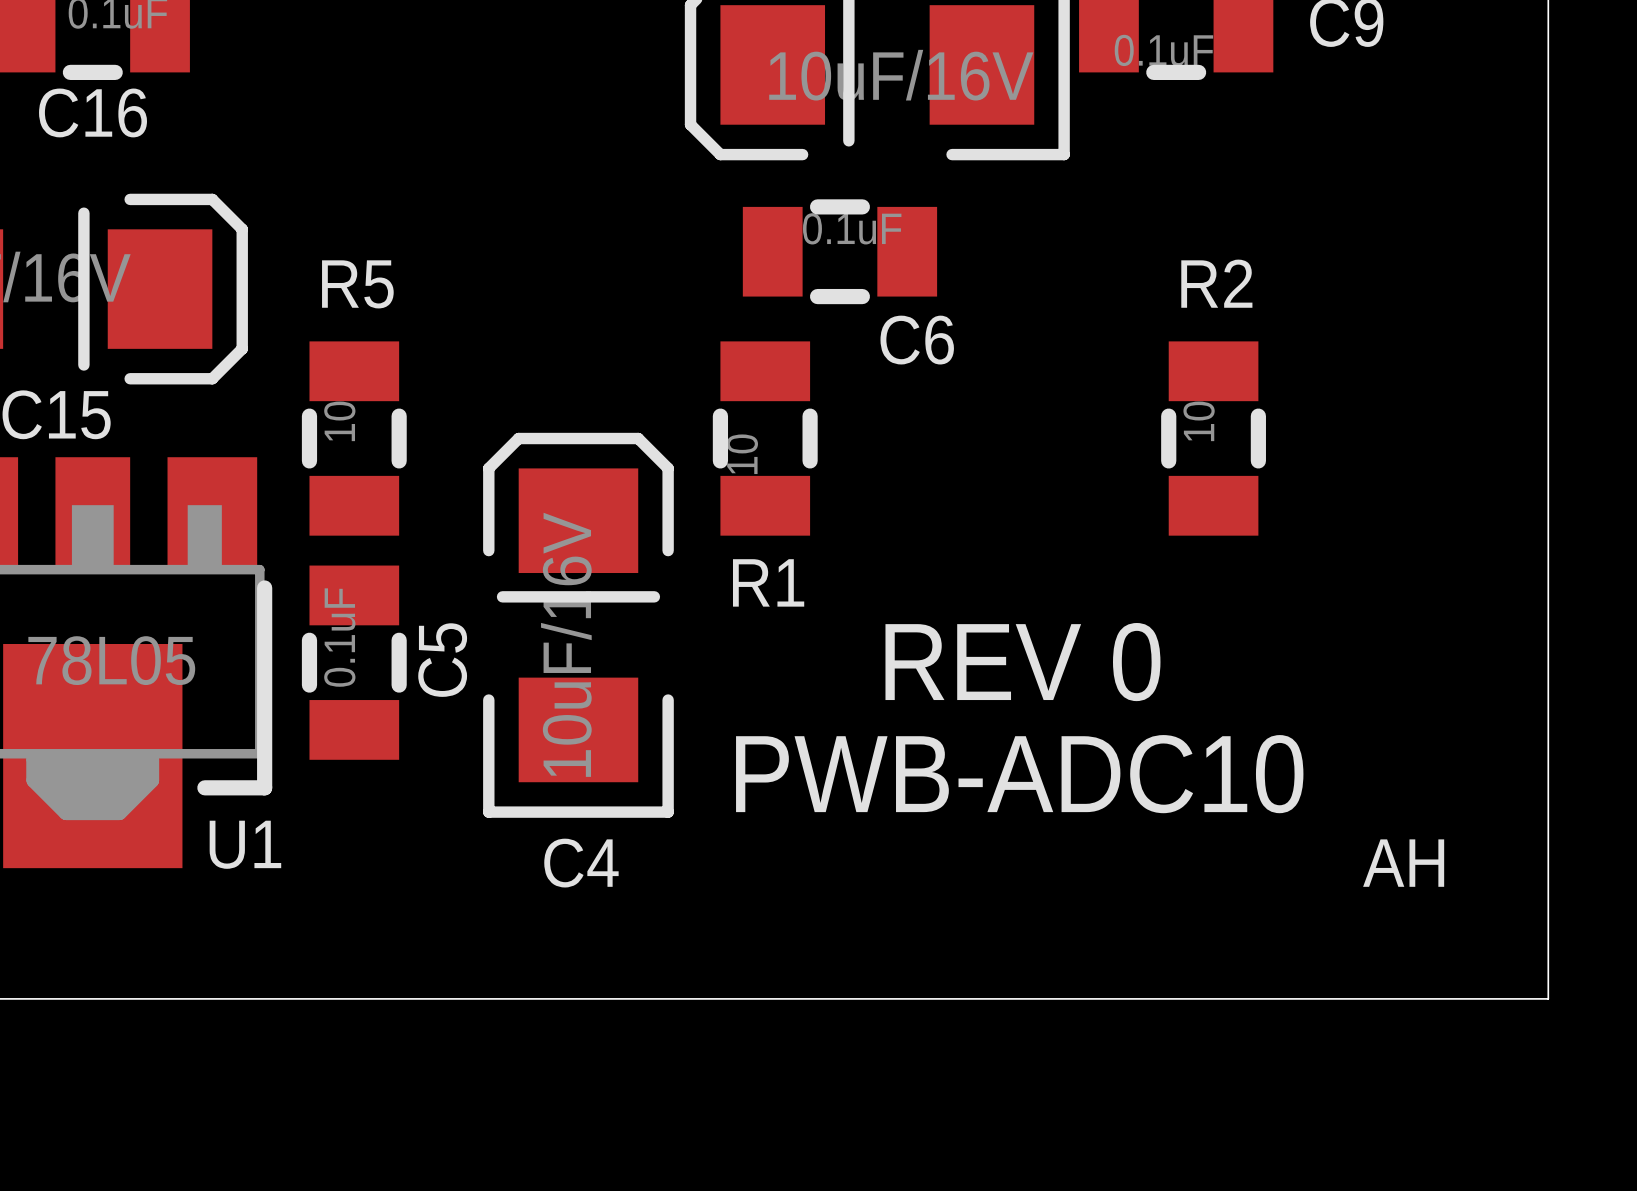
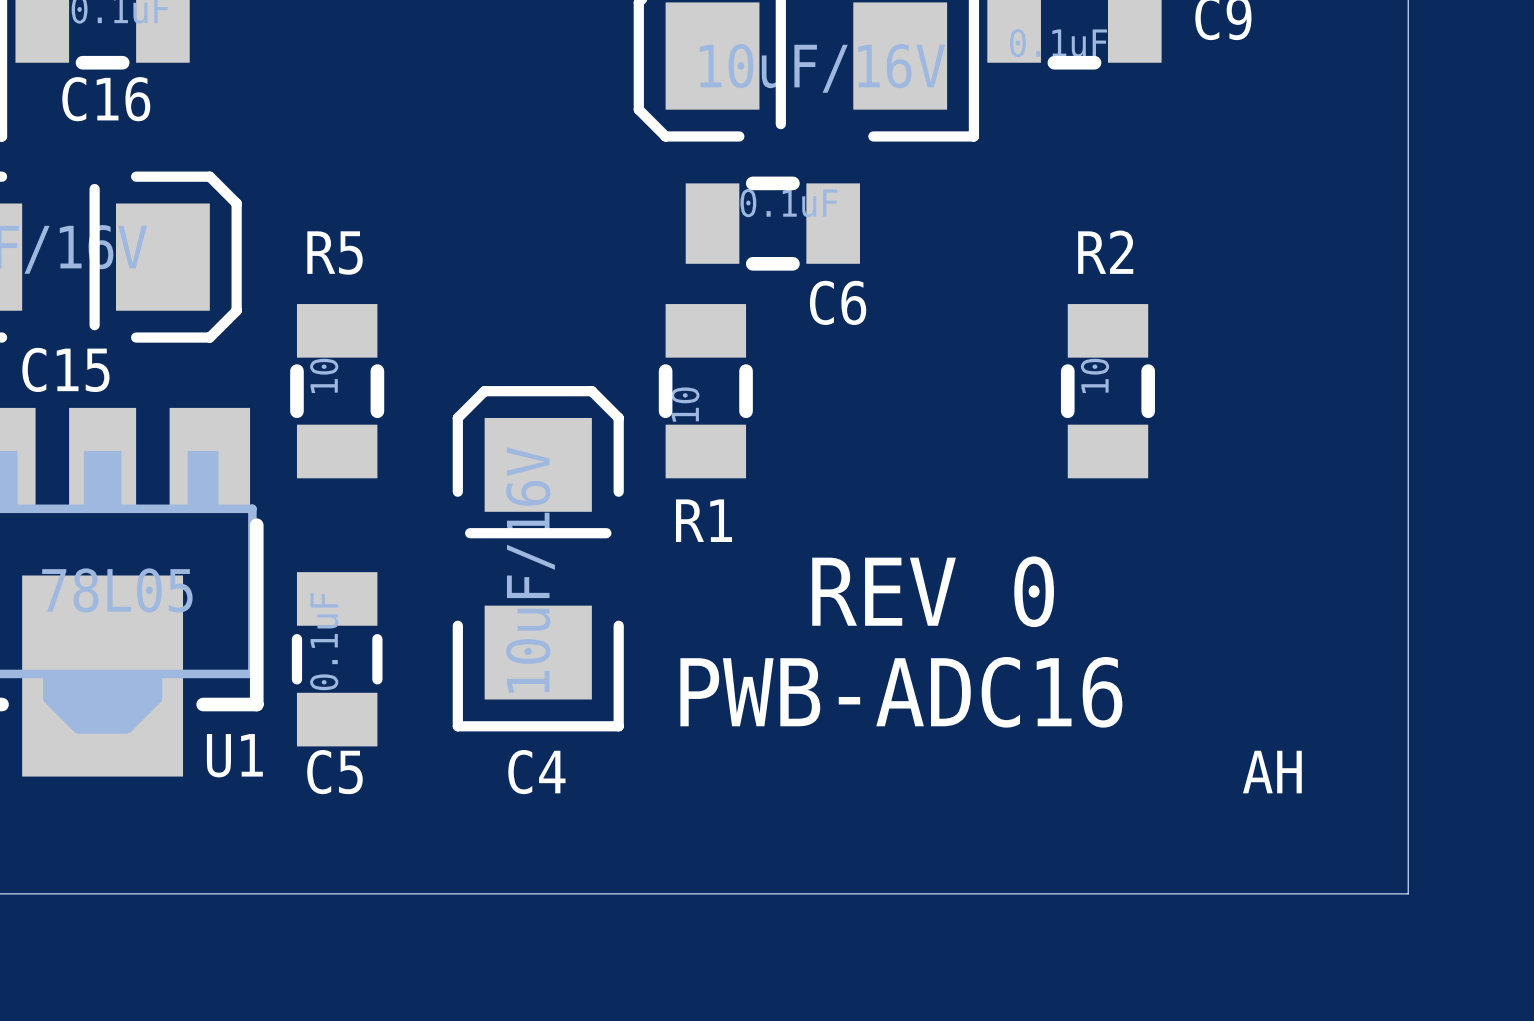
C5 footprint: [301, 565, 407, 760] -> [291, 572, 383, 747]
C5 name position: C5 (442, 660) -> C5 (334, 772)
text: PWB-ADC10 (1019, 774) -> PWB-ADC16 (901, 692)

